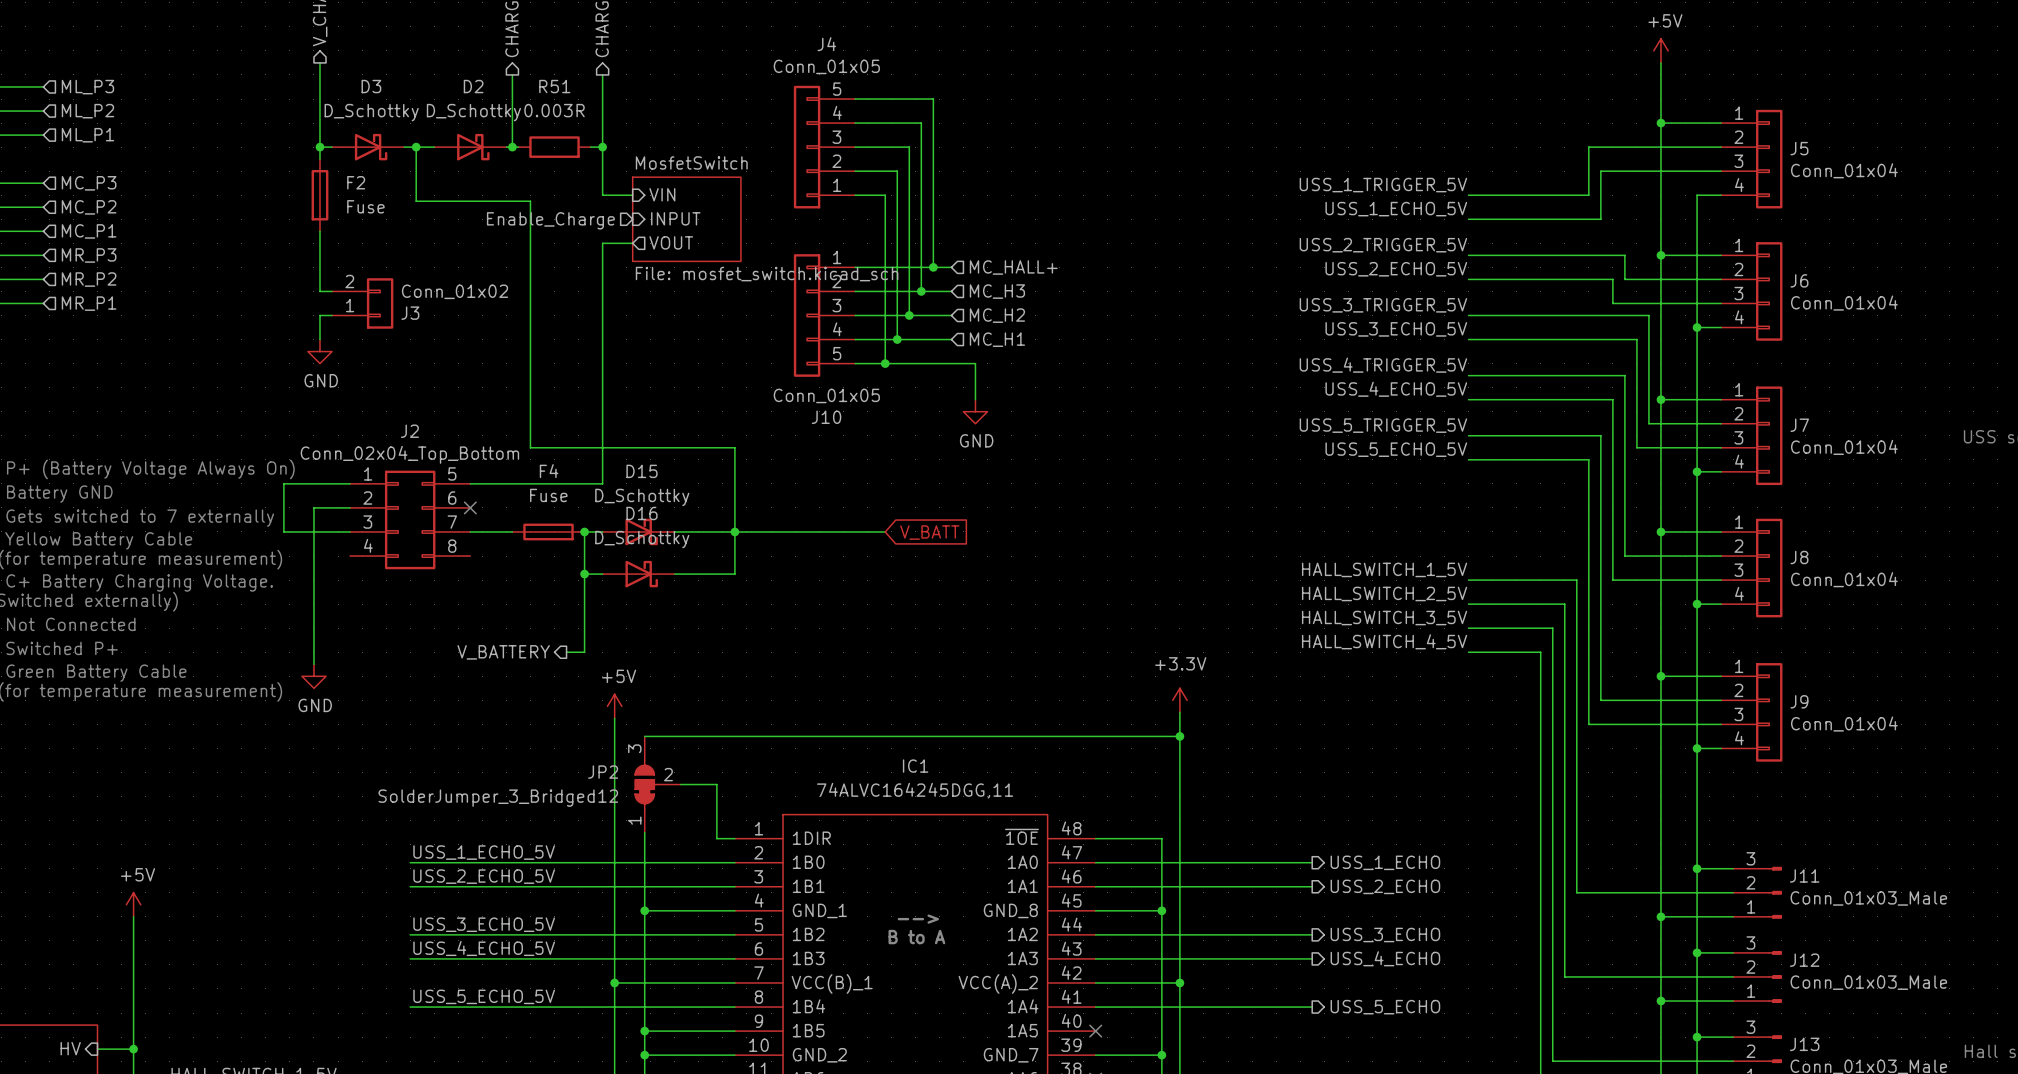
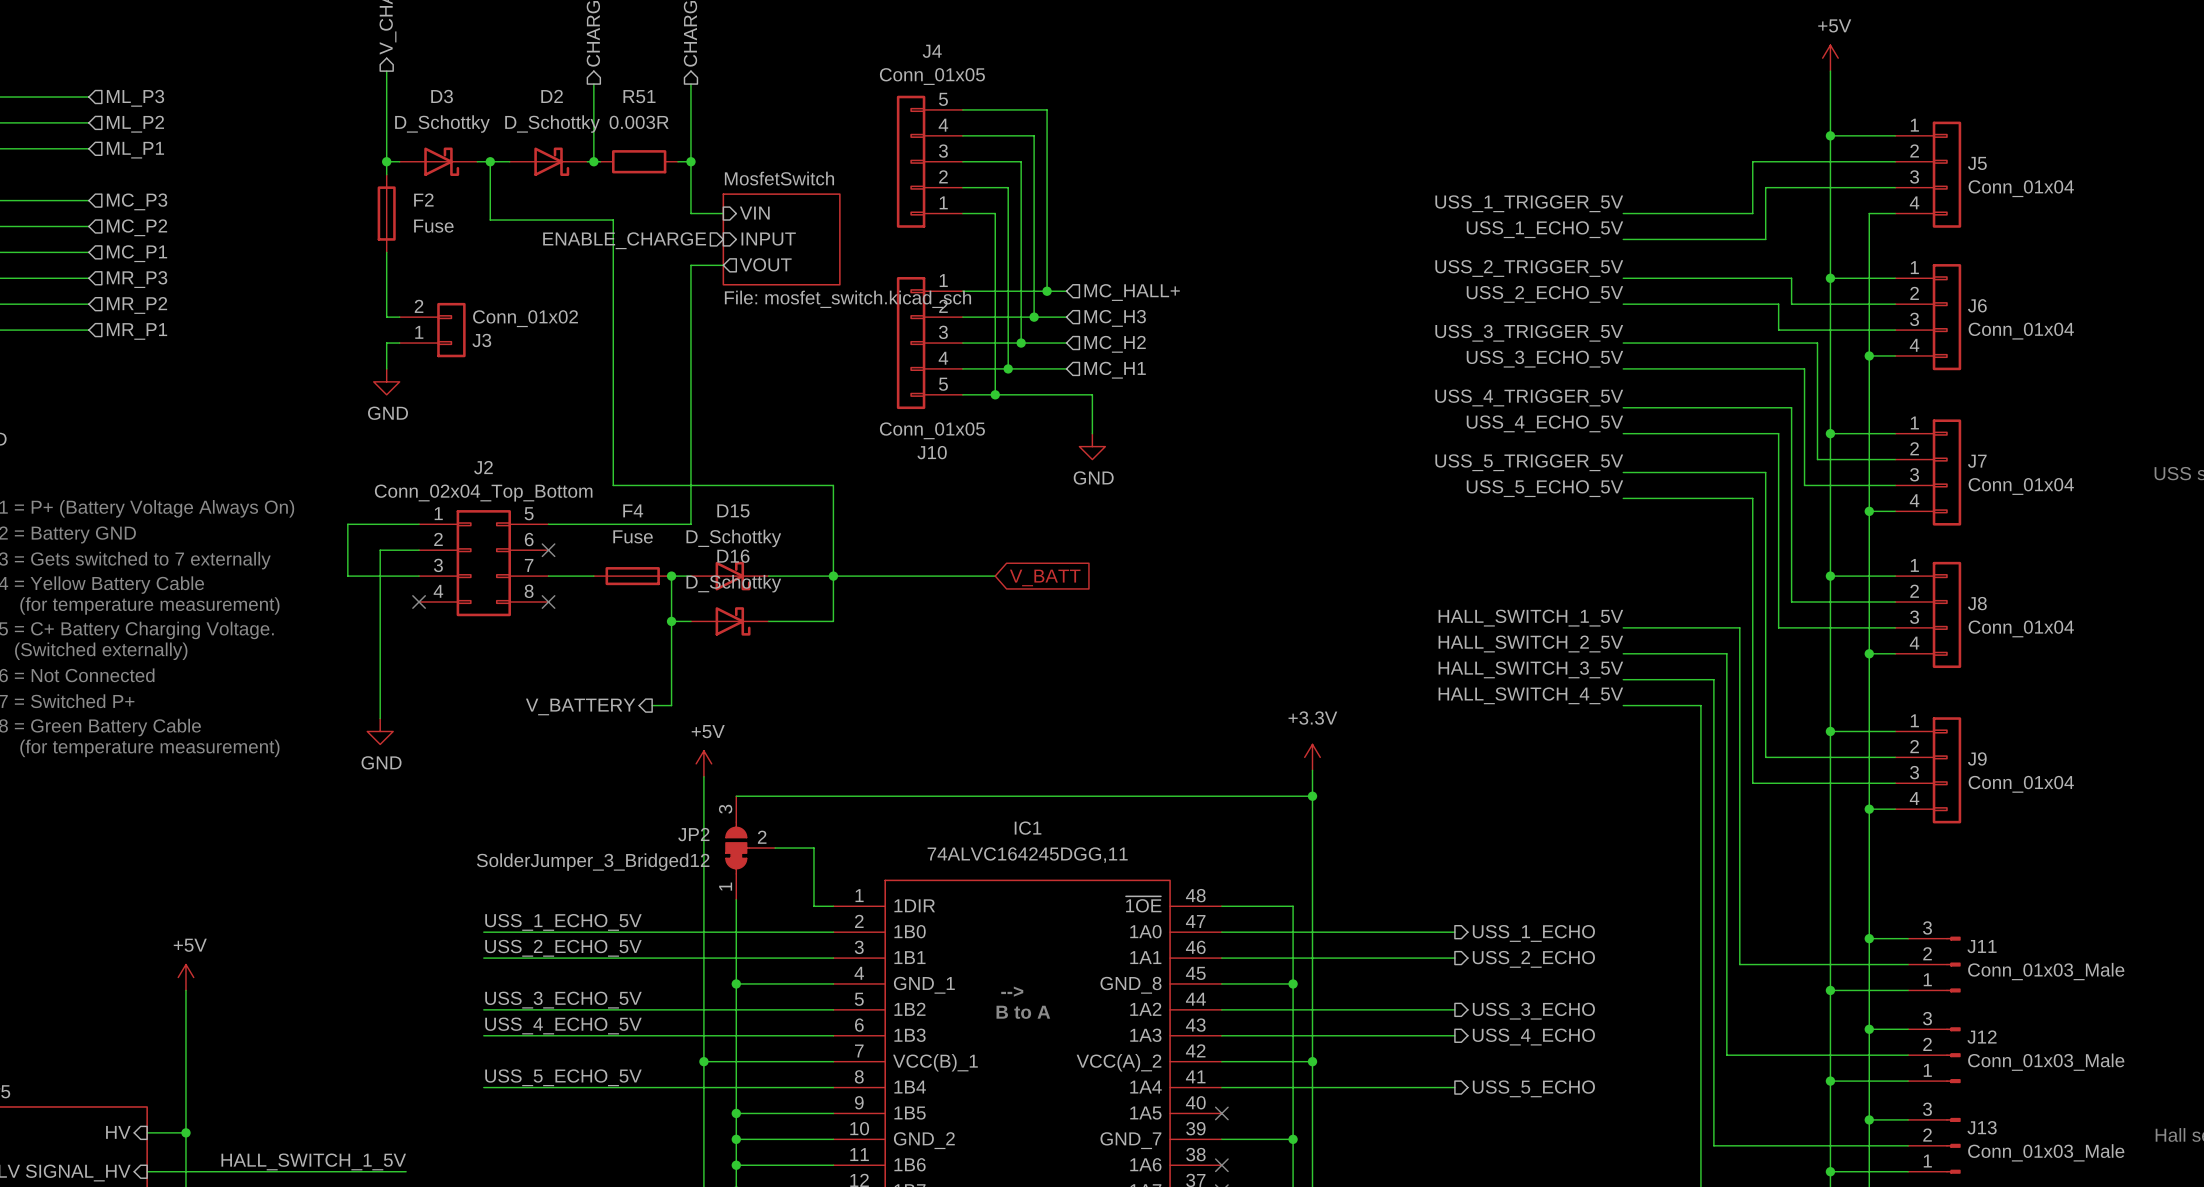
hierarchical label: Enable_Charge (550, 220) -> ENABLE_CHARGE (624, 240)
no-connect mark: none -> (419, 601)
no-connect mark: none -> (548, 601)

